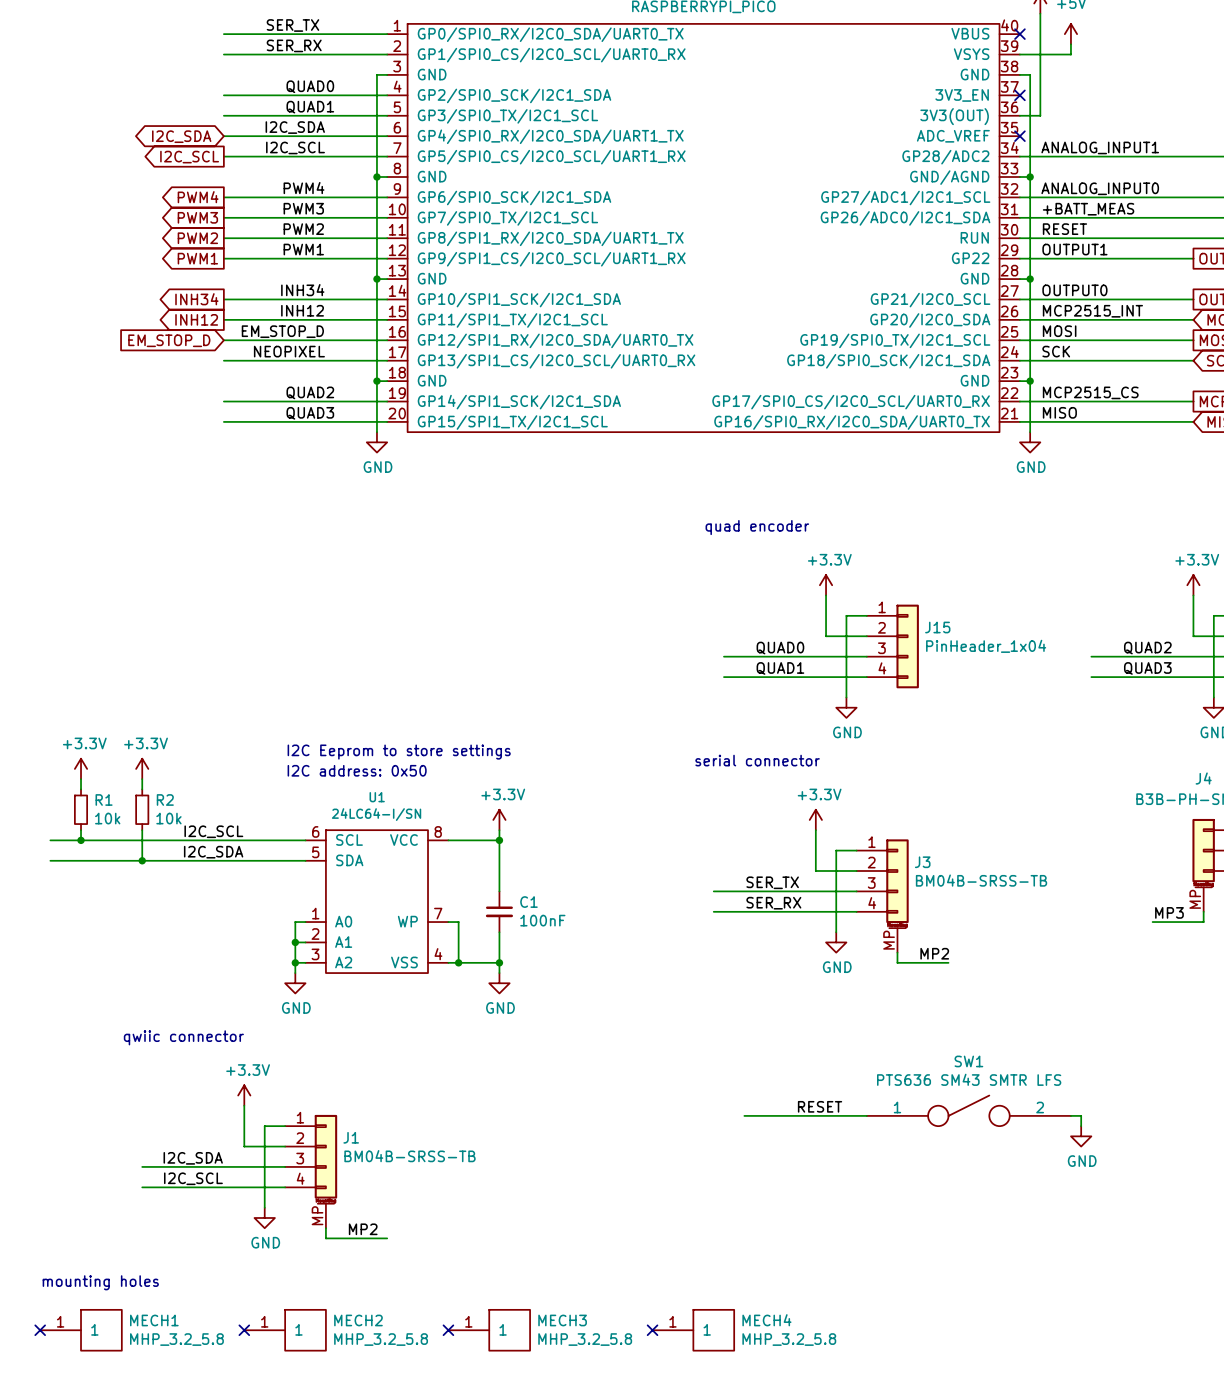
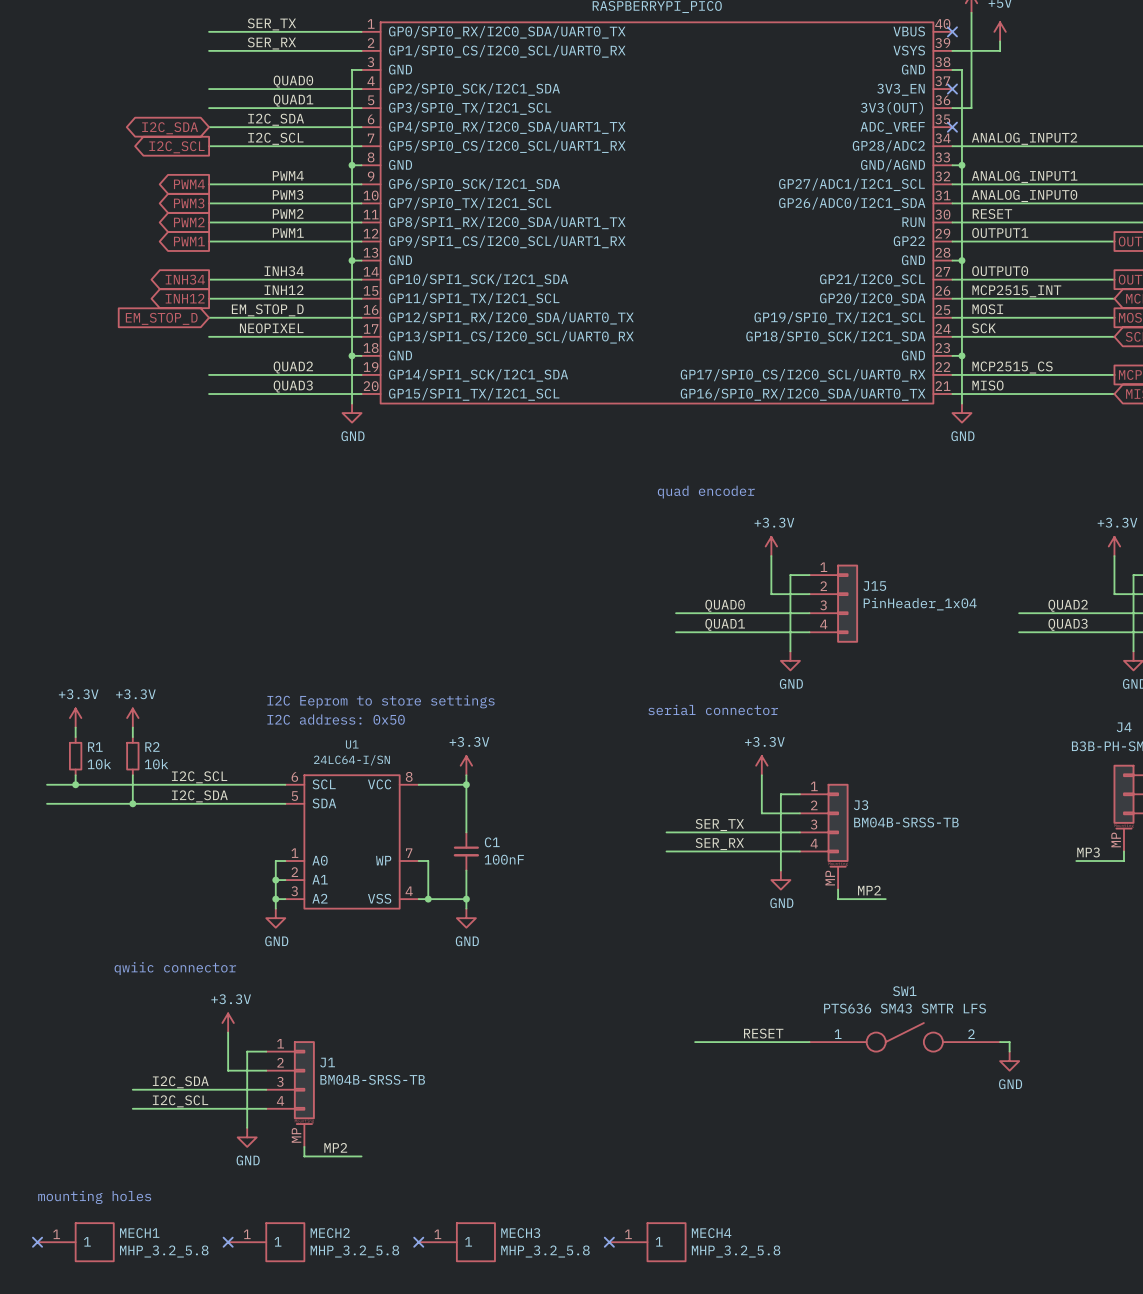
label: ANALOG_INPUT1 (1100, 147) -> ANALOG_INPUT2 (1024, 138)
label: ANALOG_INPUT0 (1100, 188) -> ANALOG_INPUT1 (1024, 176)
label: +BATT_MEAS (1088, 209) -> ANALOG_INPUT0 (1024, 195)

